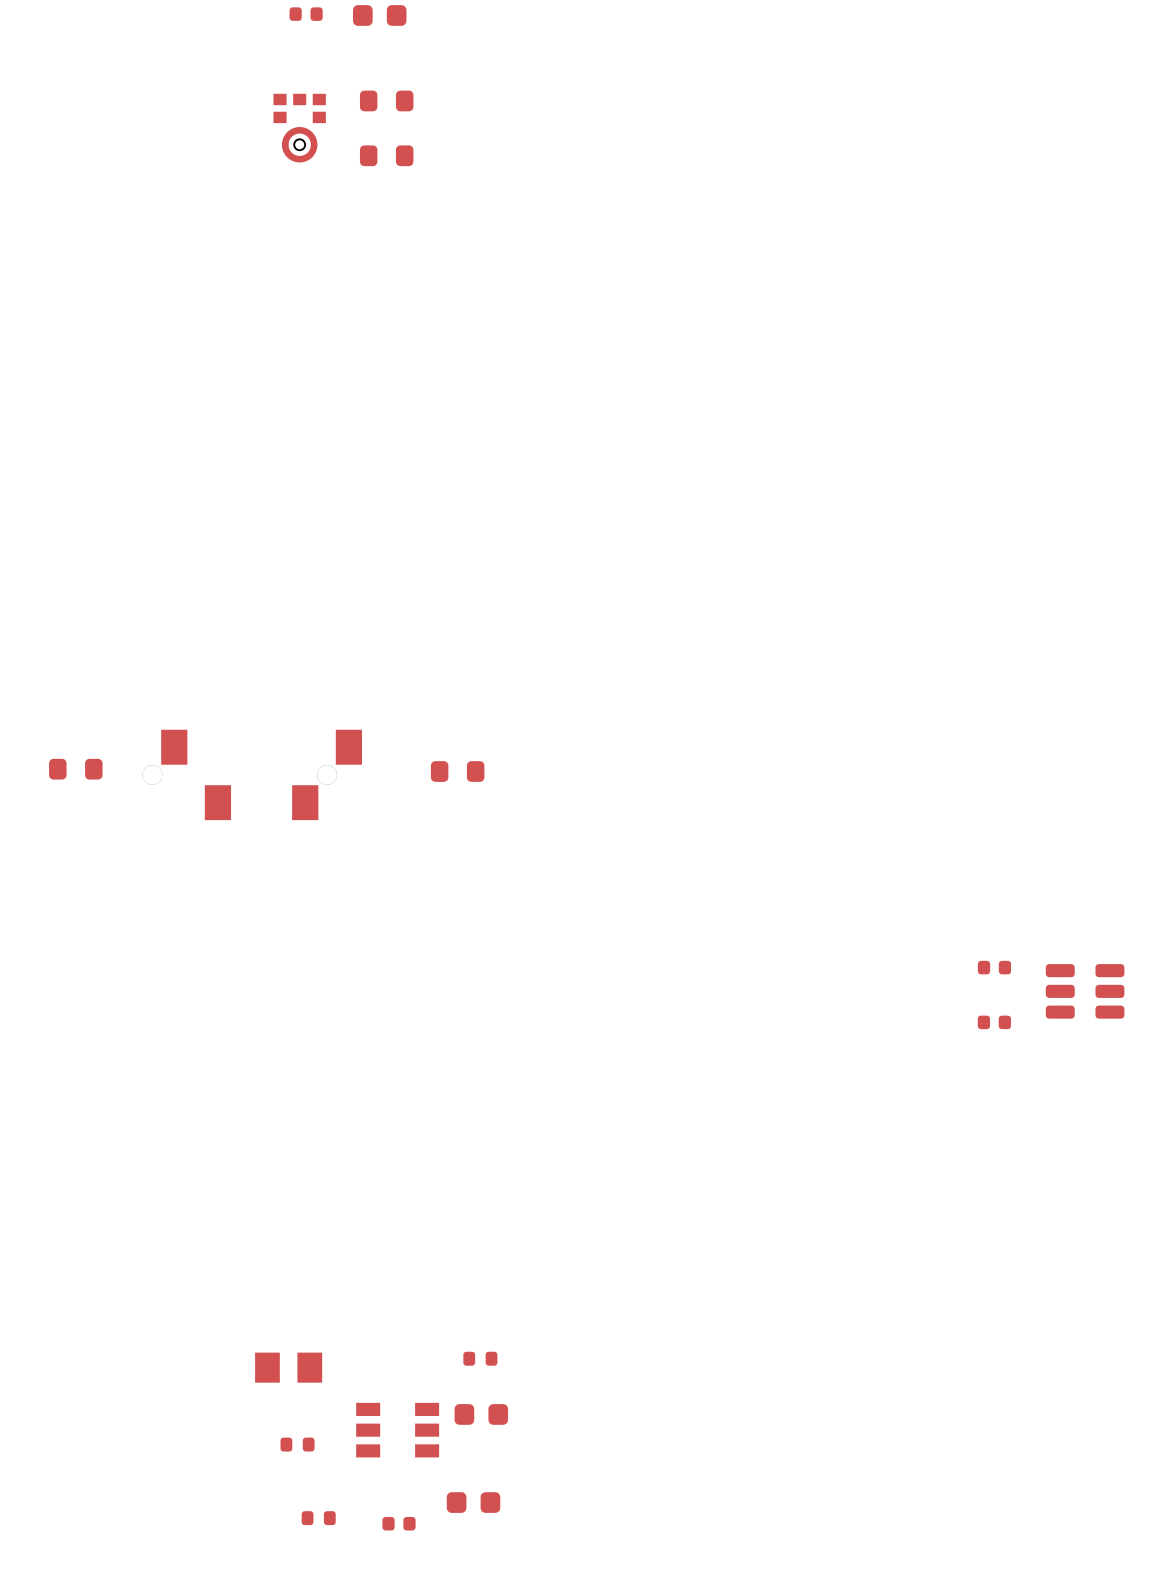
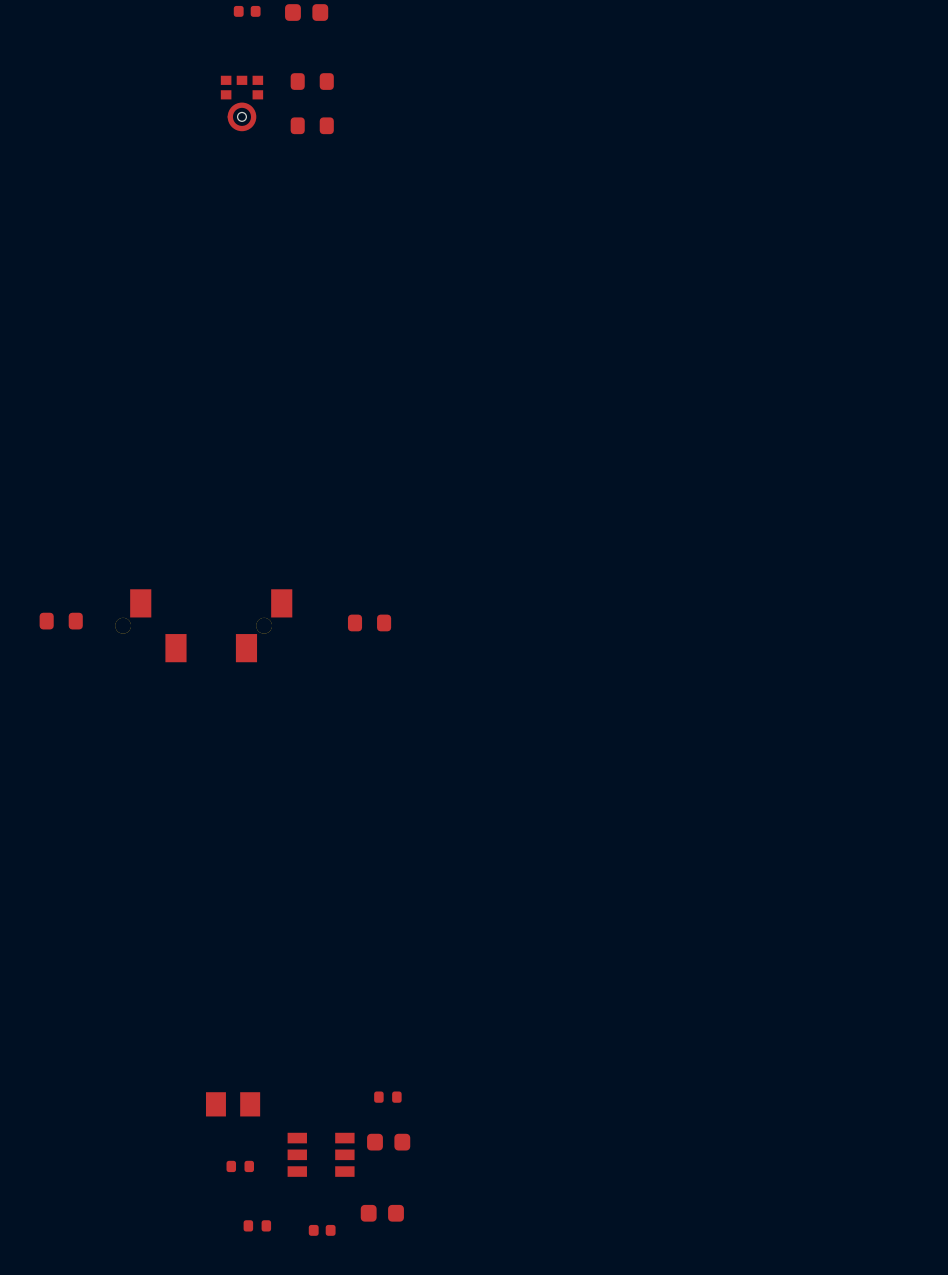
part: (994, 967) -> none
part: (1085, 991) -> none
part: (994, 1022) -> none

